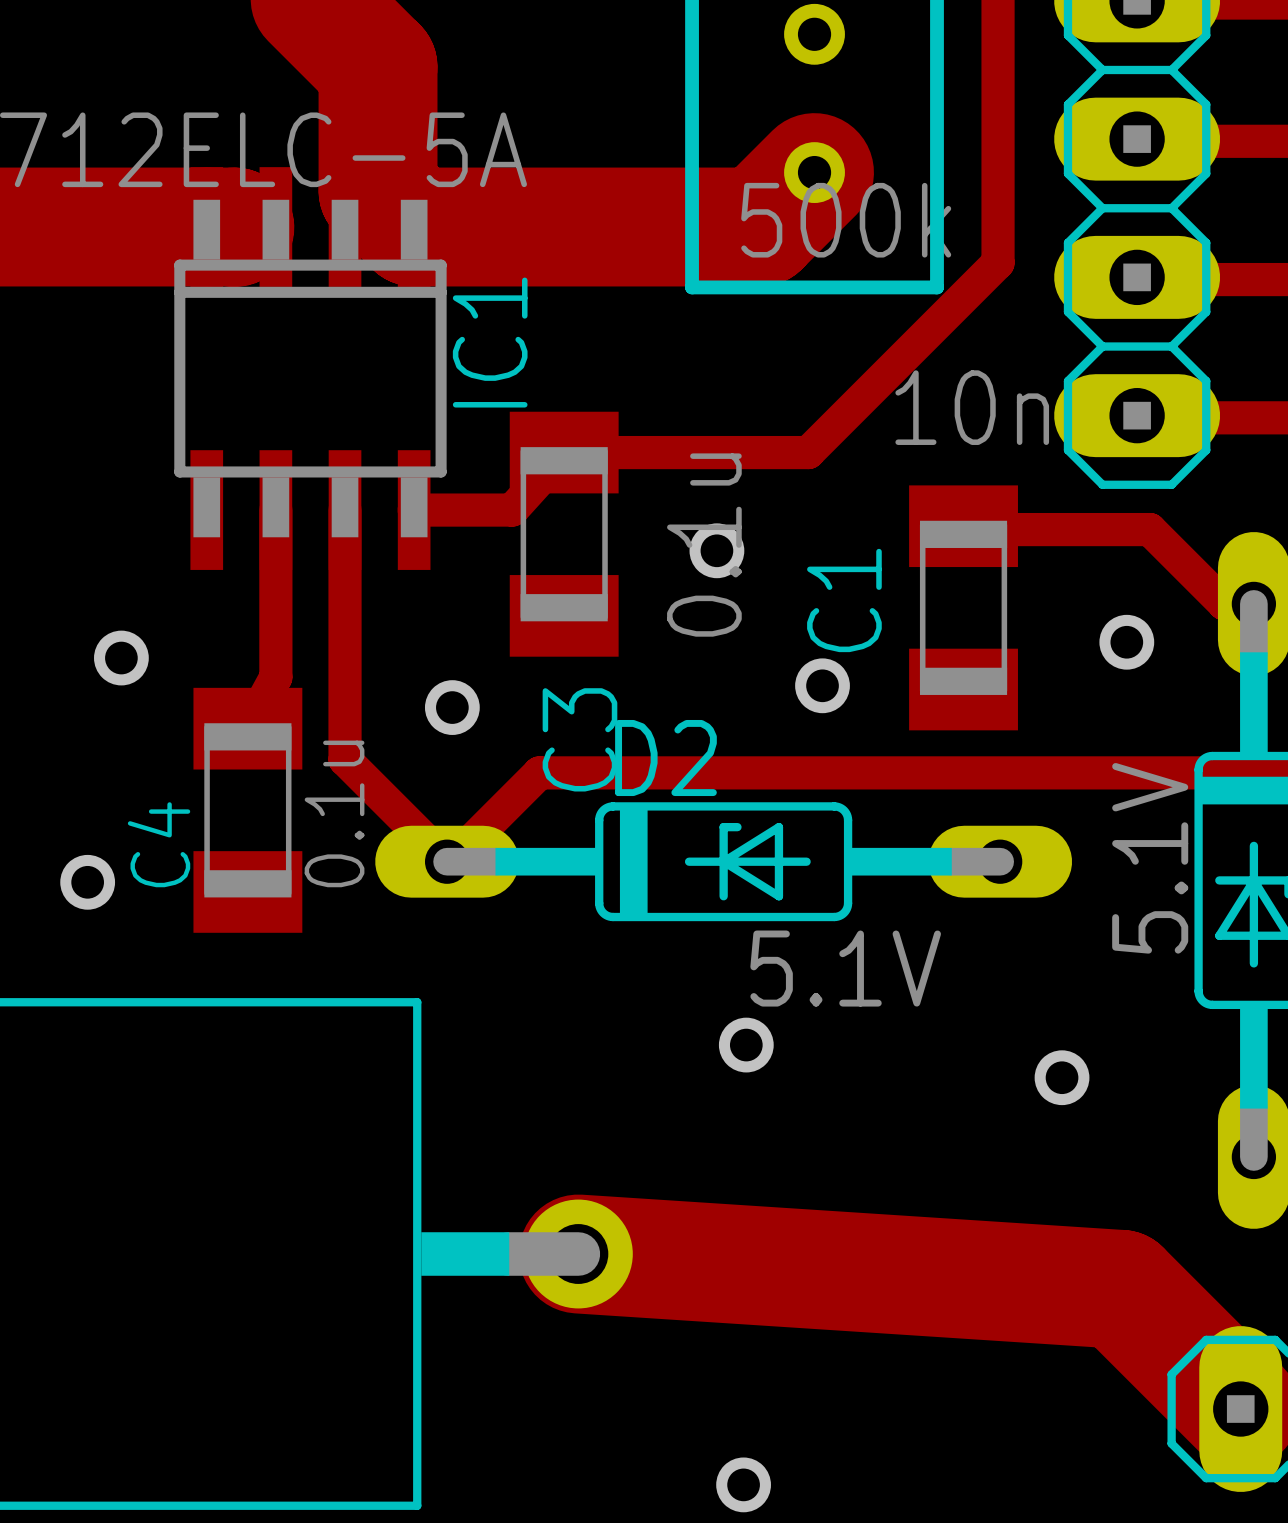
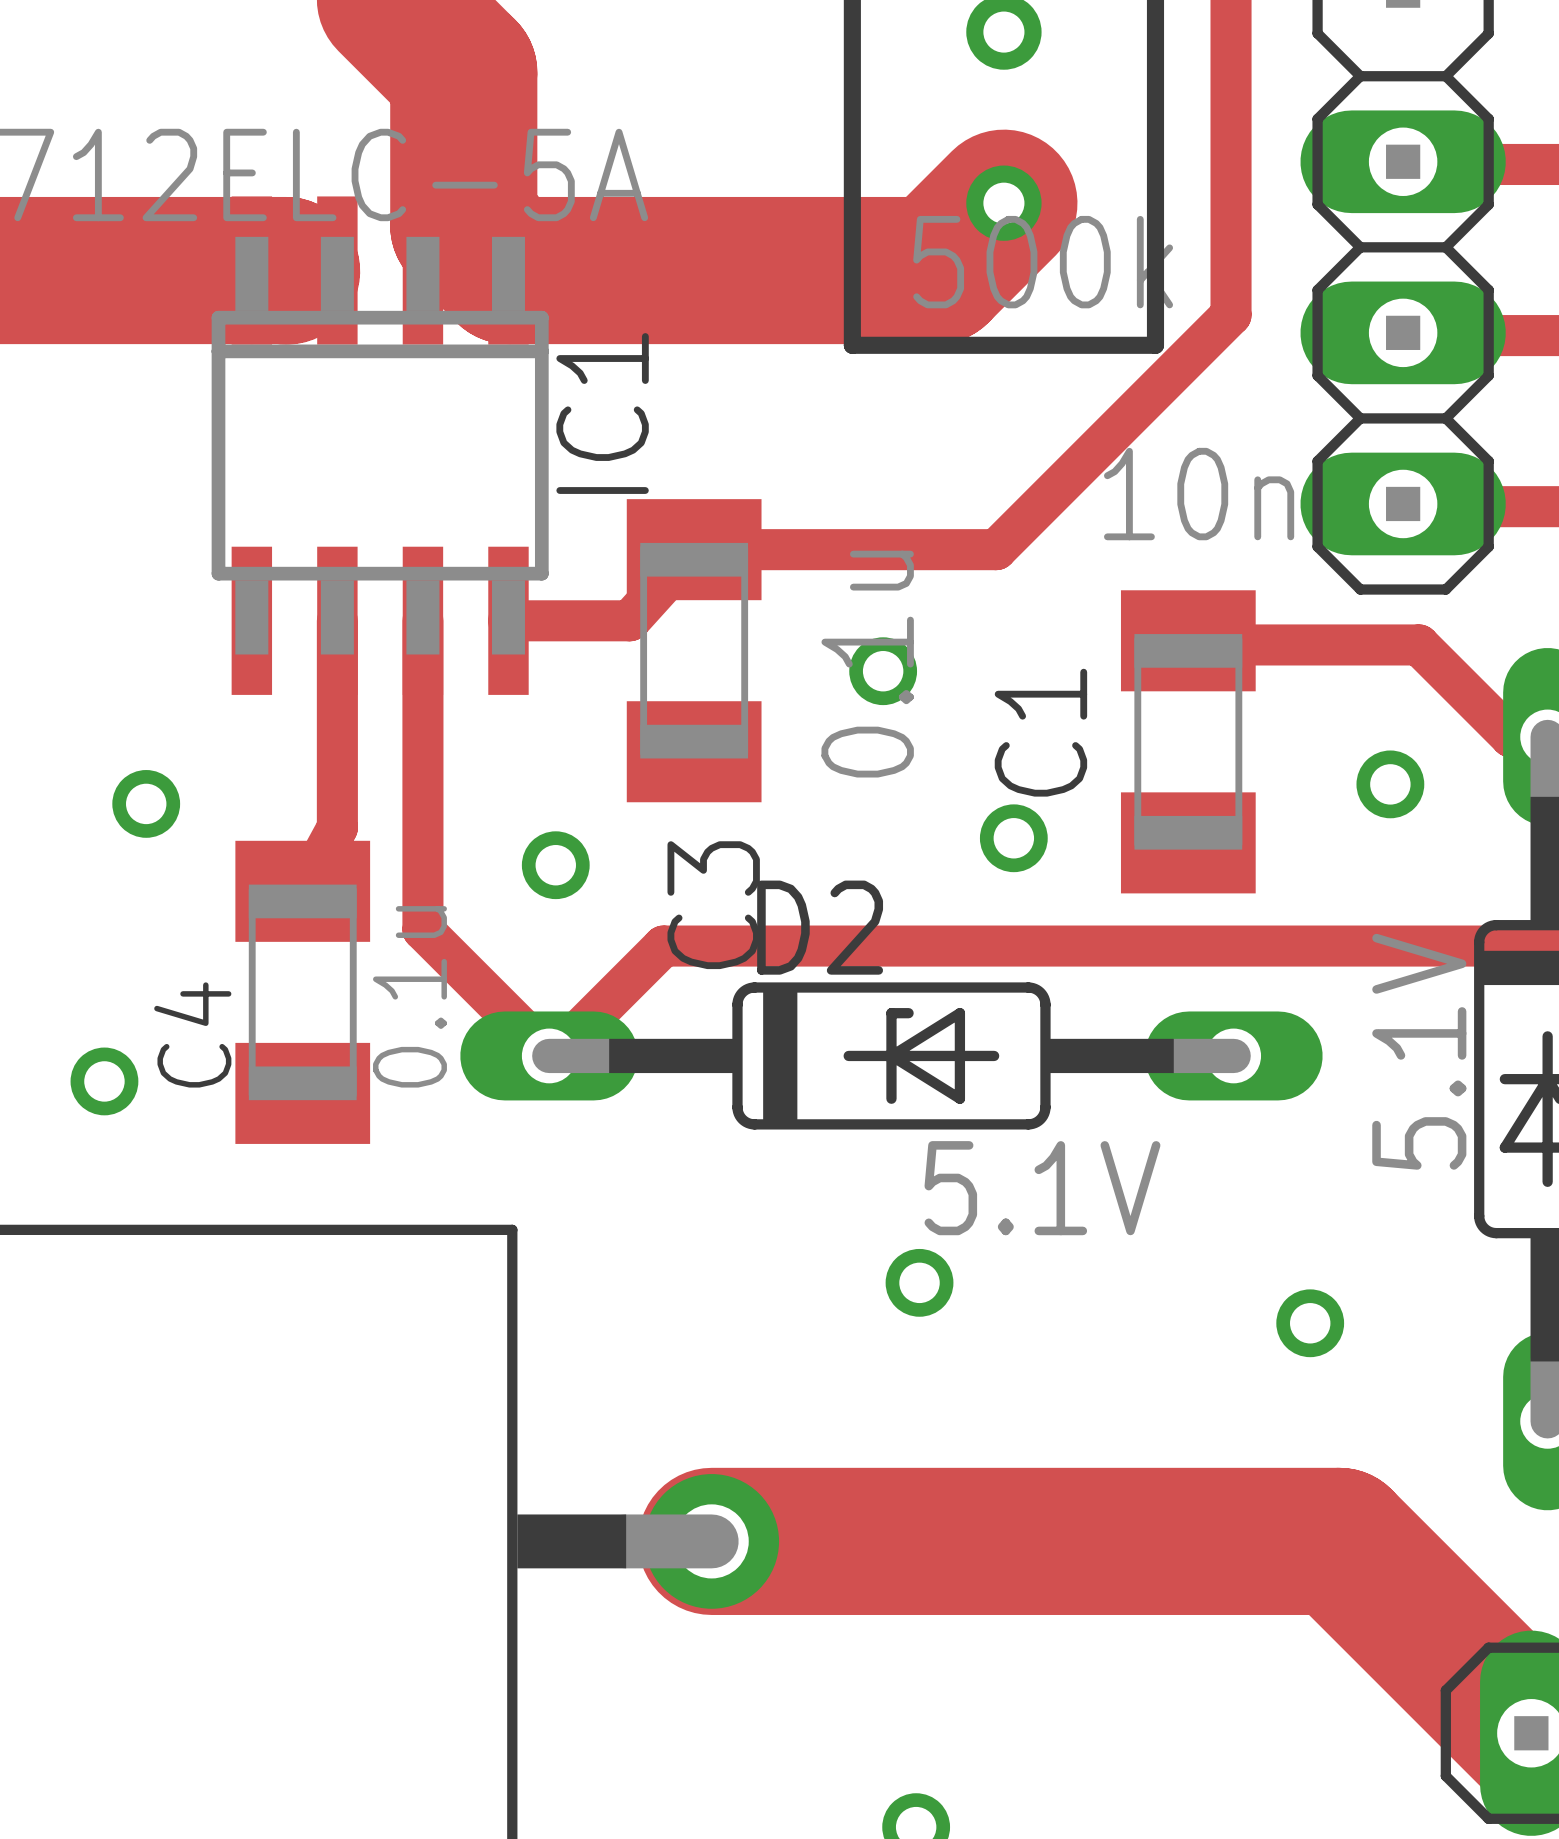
track: (578, 1254) (1121, 1289) -> (711, 1541) (1339, 1541) (1383, 1585)

